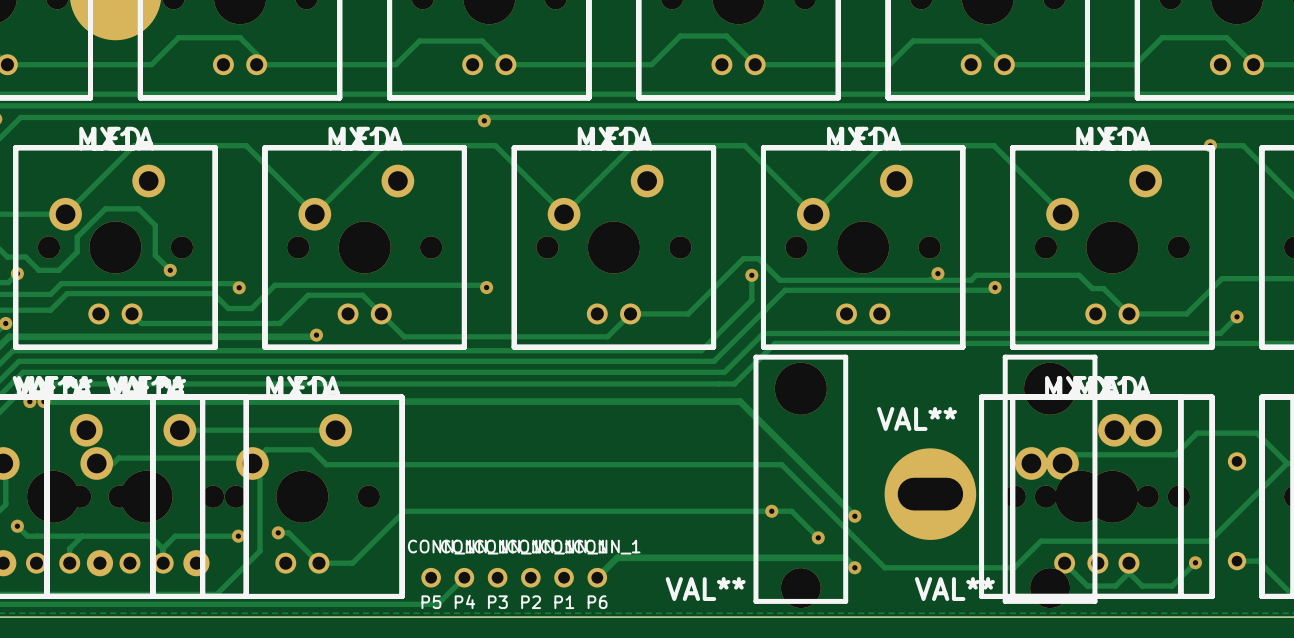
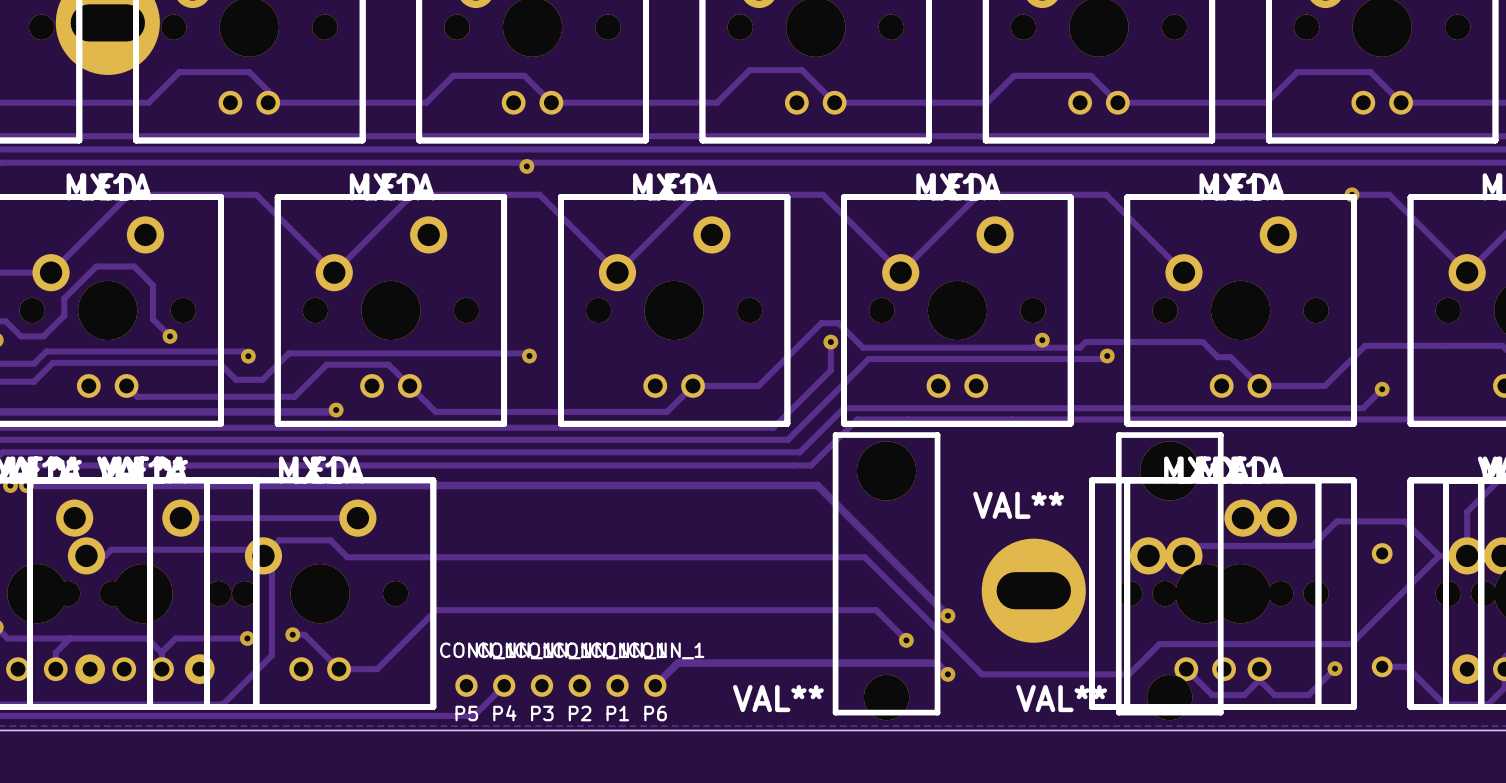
via: (771, 511) -> none

